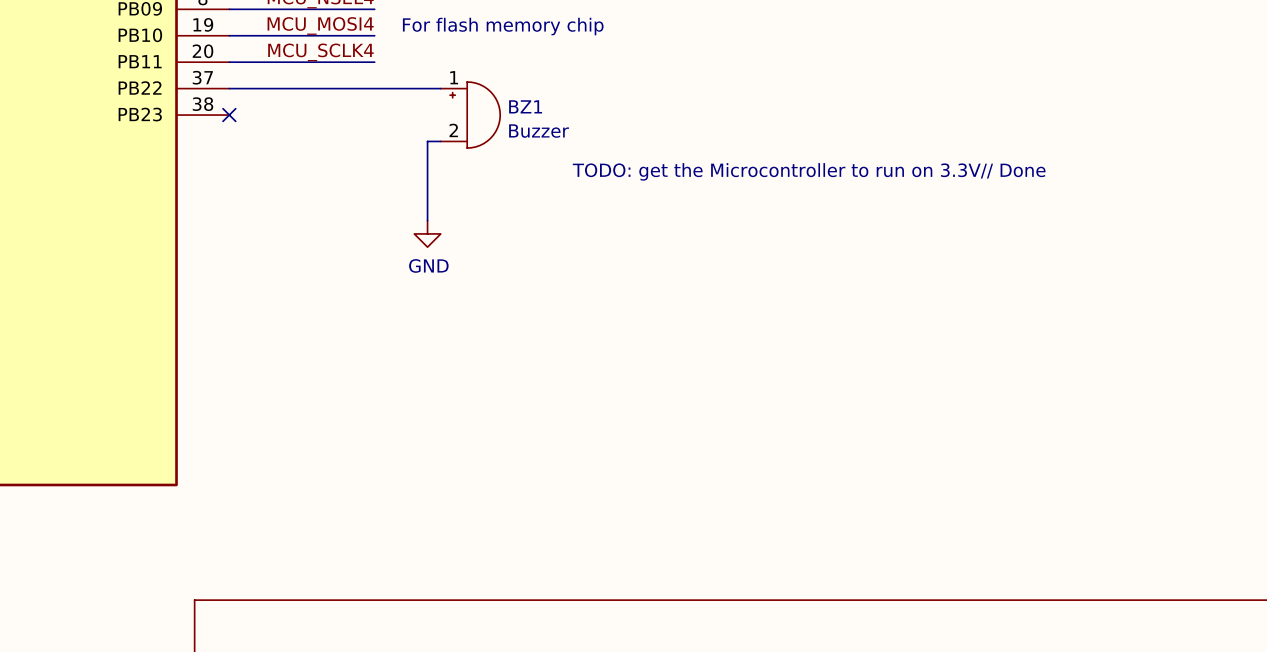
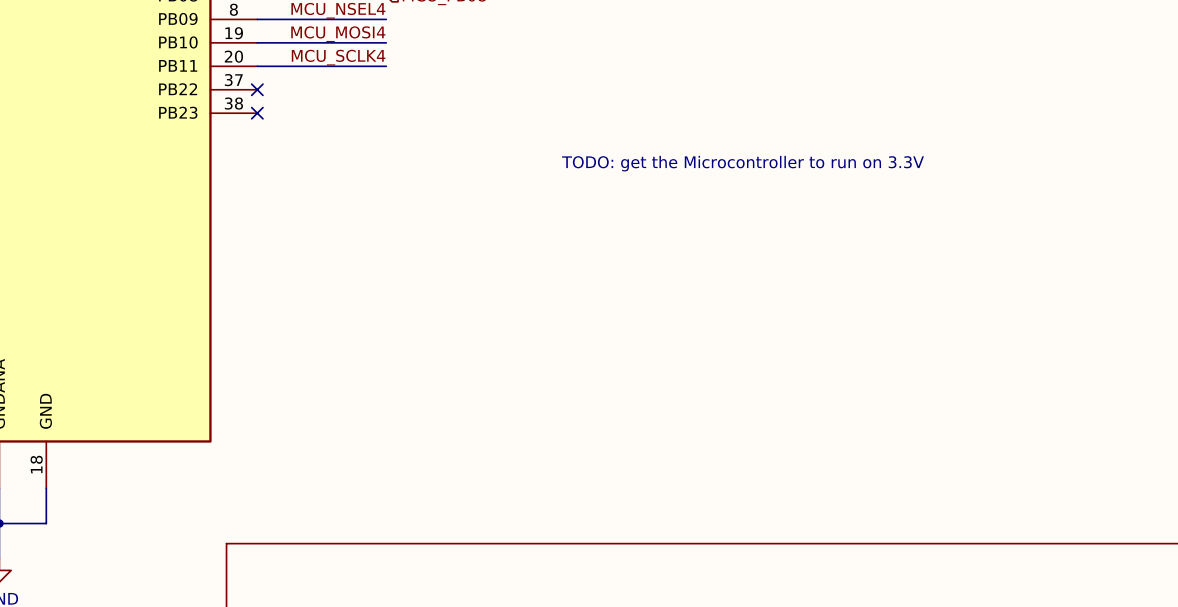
text: For flash memory chip (503, 26) -> none
wire: (229, 88) (440, 88) -> none
no-connect mark: none -> (257, 89)
BZ1: Buzzer (470, 115) -> none
wire: (440, 141) (427, 141) (427, 220) -> none
text: TODO: get the Microcontroller to run on 3.3V// Done (809, 171) -> TODO: get the Microcontroller to run on 3.3V (743, 163)
power symbol: GND (427, 233) -> none

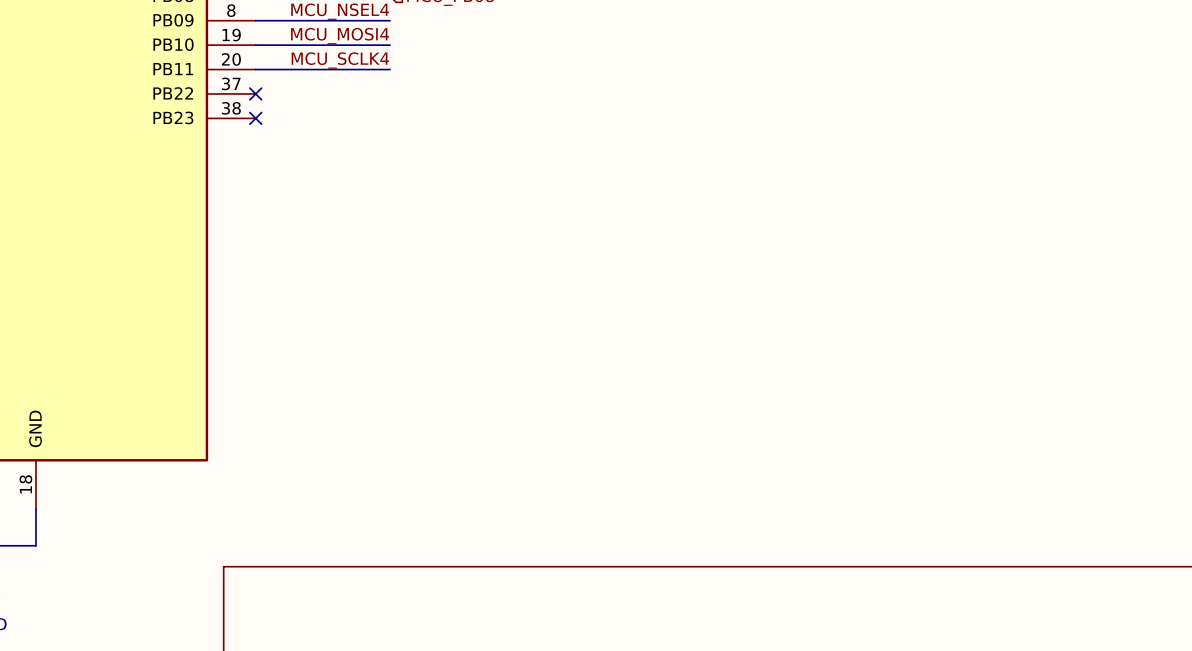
text: TODO: get the Microcontroller to run on 3.3V (743, 163) -> none

